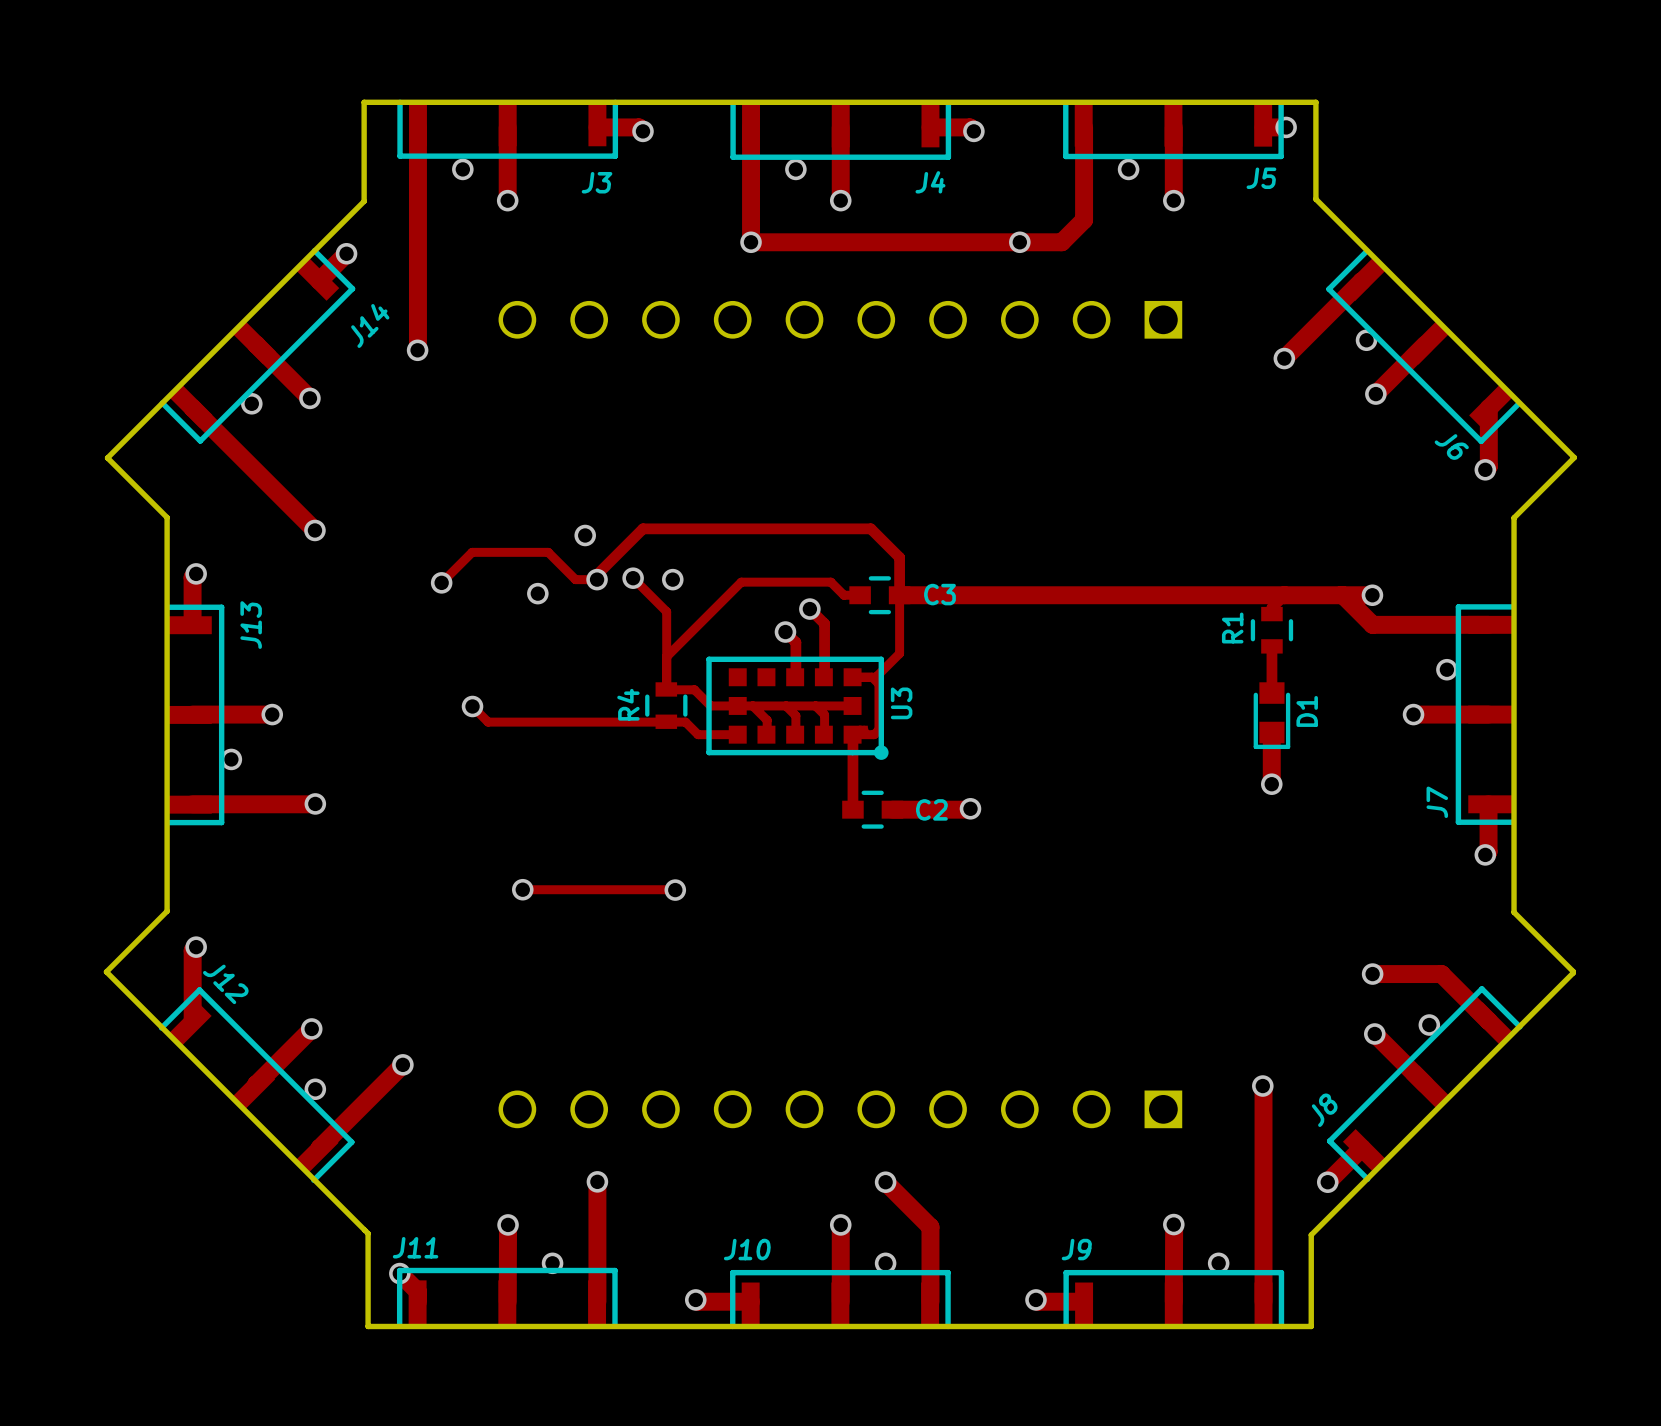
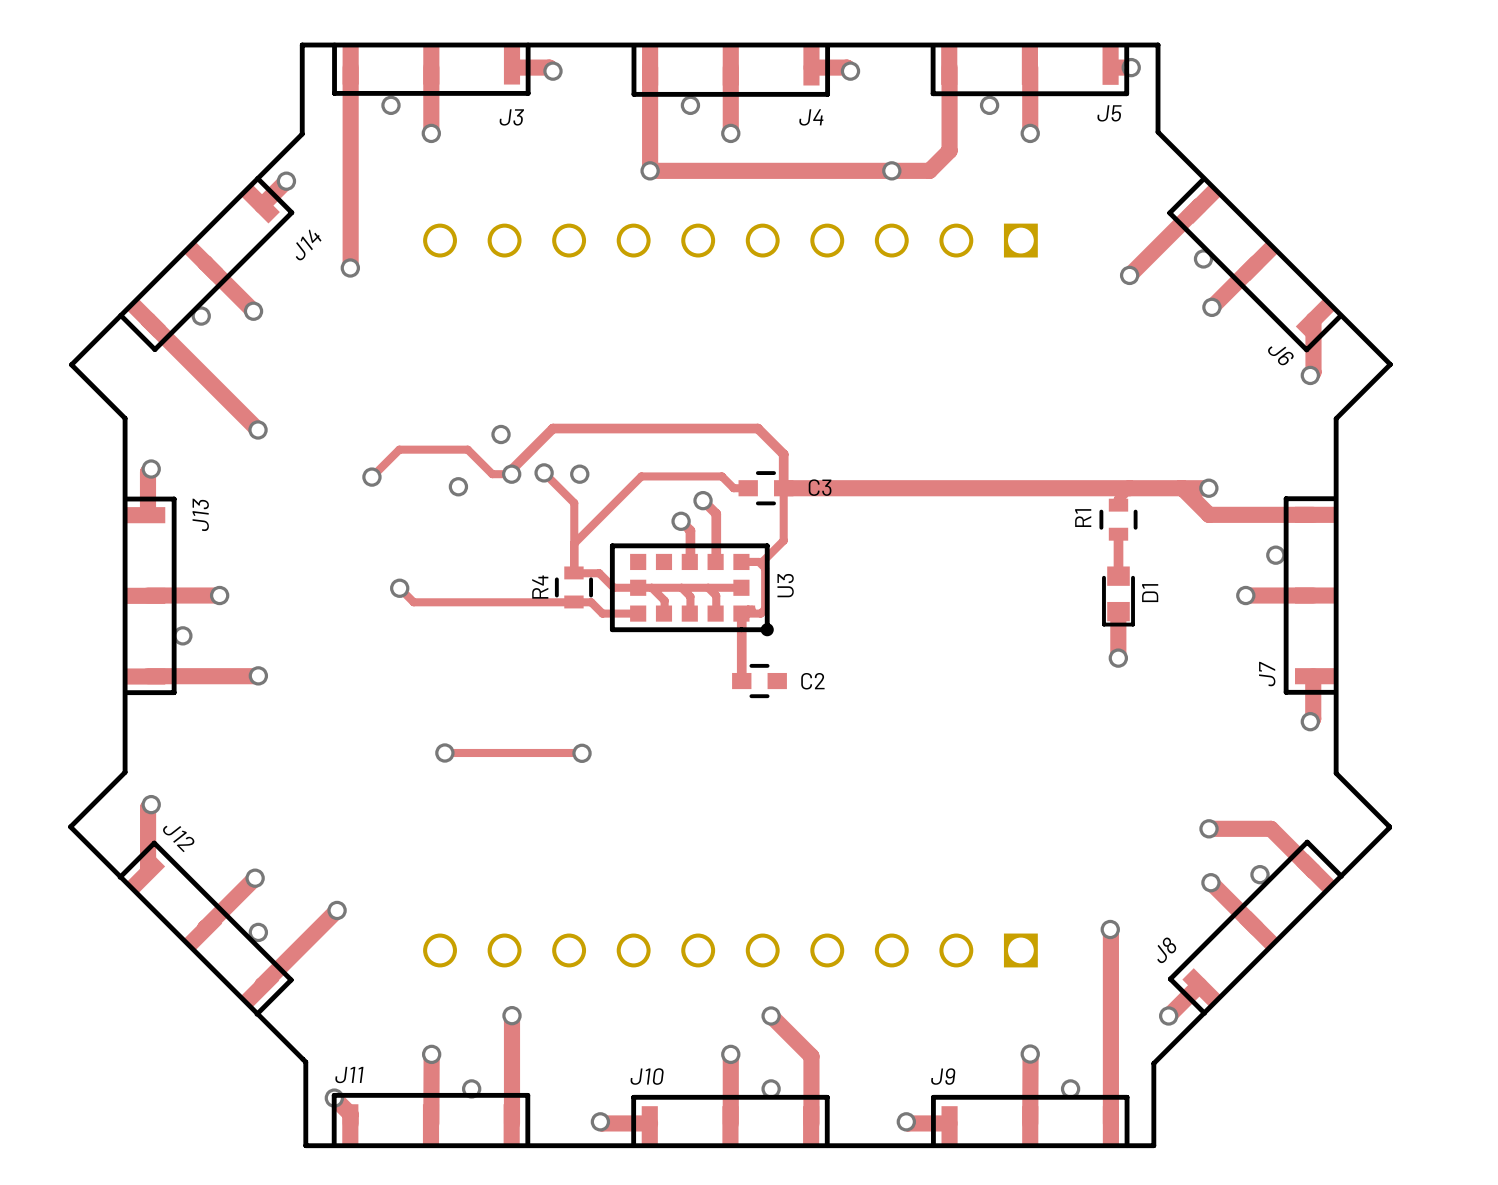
track: (970, 808) (892, 809) -> none
via: (970, 808) -> none

